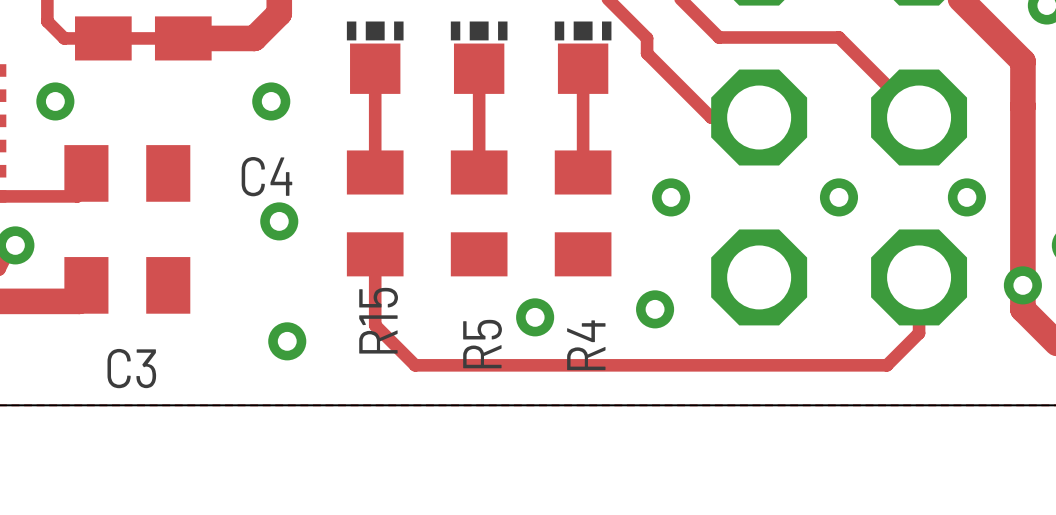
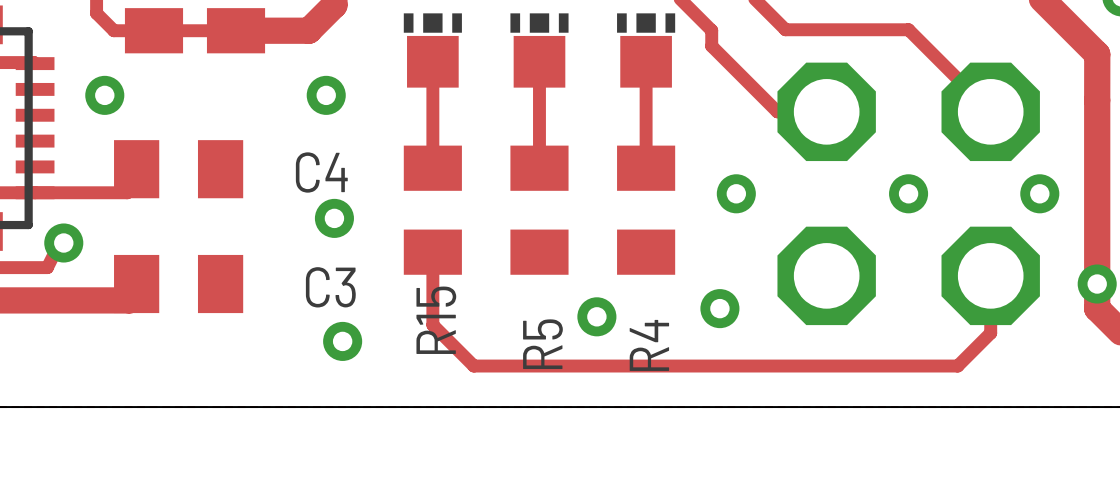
C3 name position: C3 (131, 368) -> C3 (330, 287)

